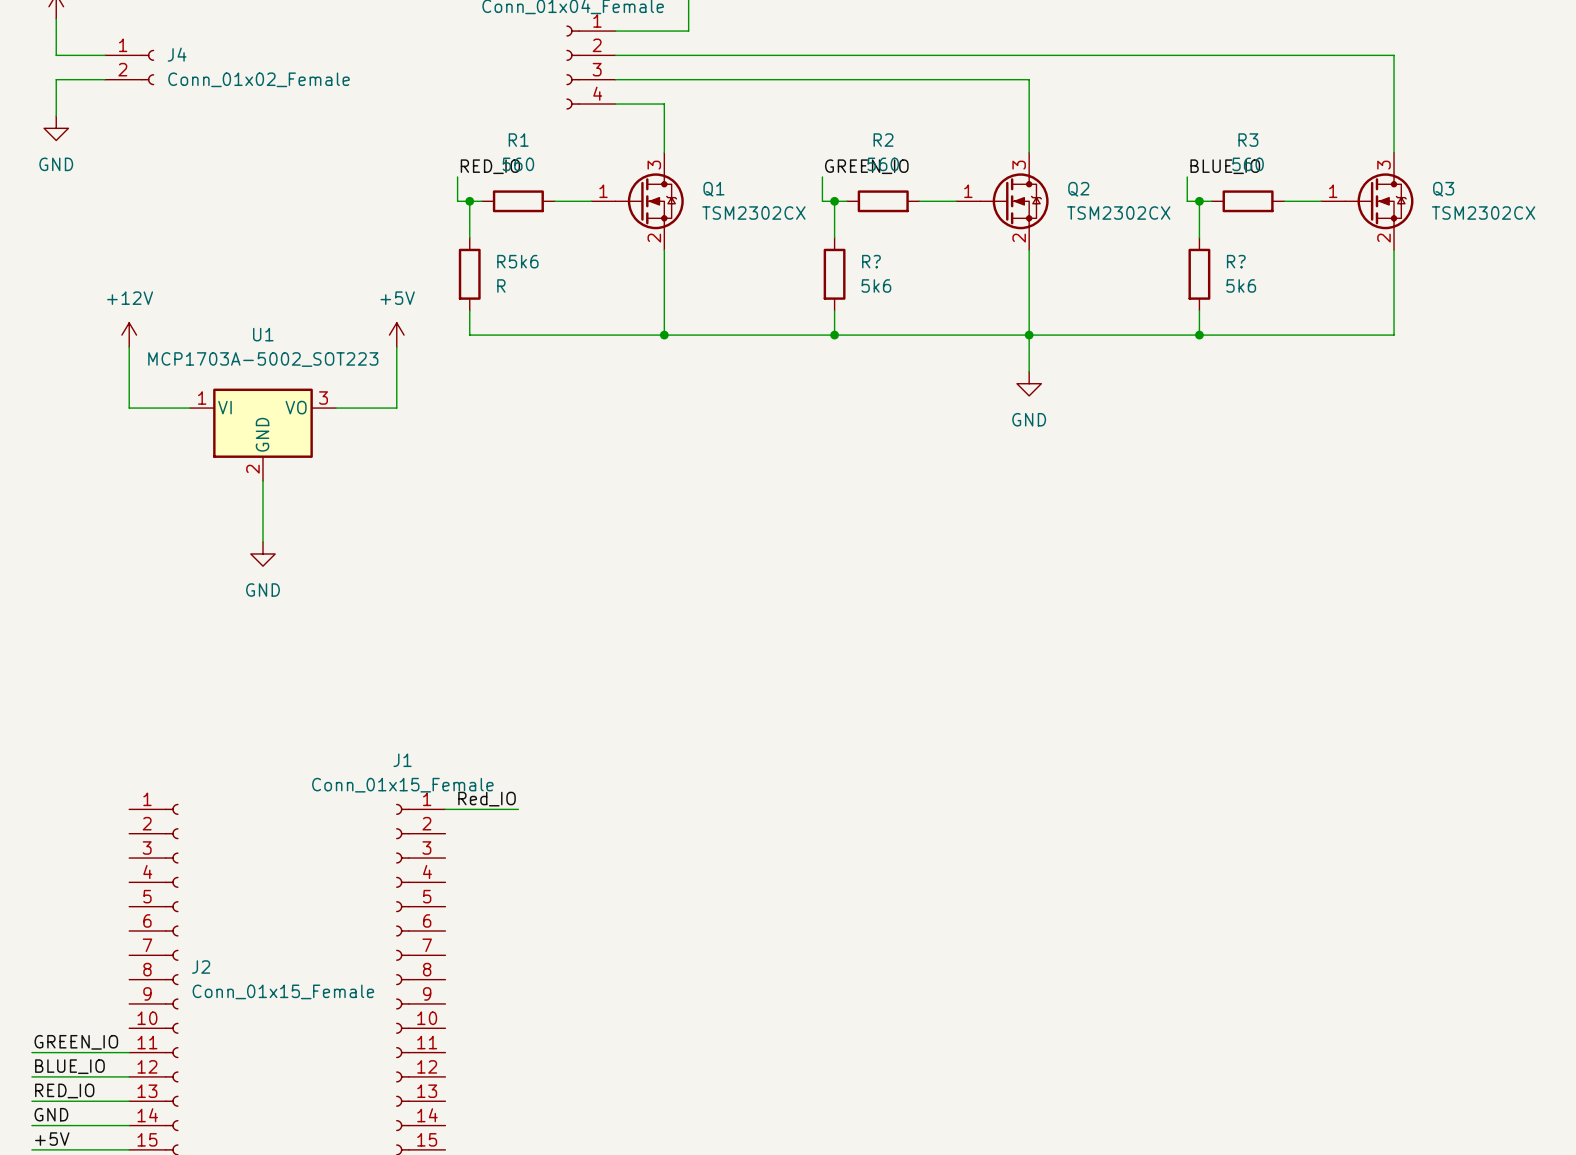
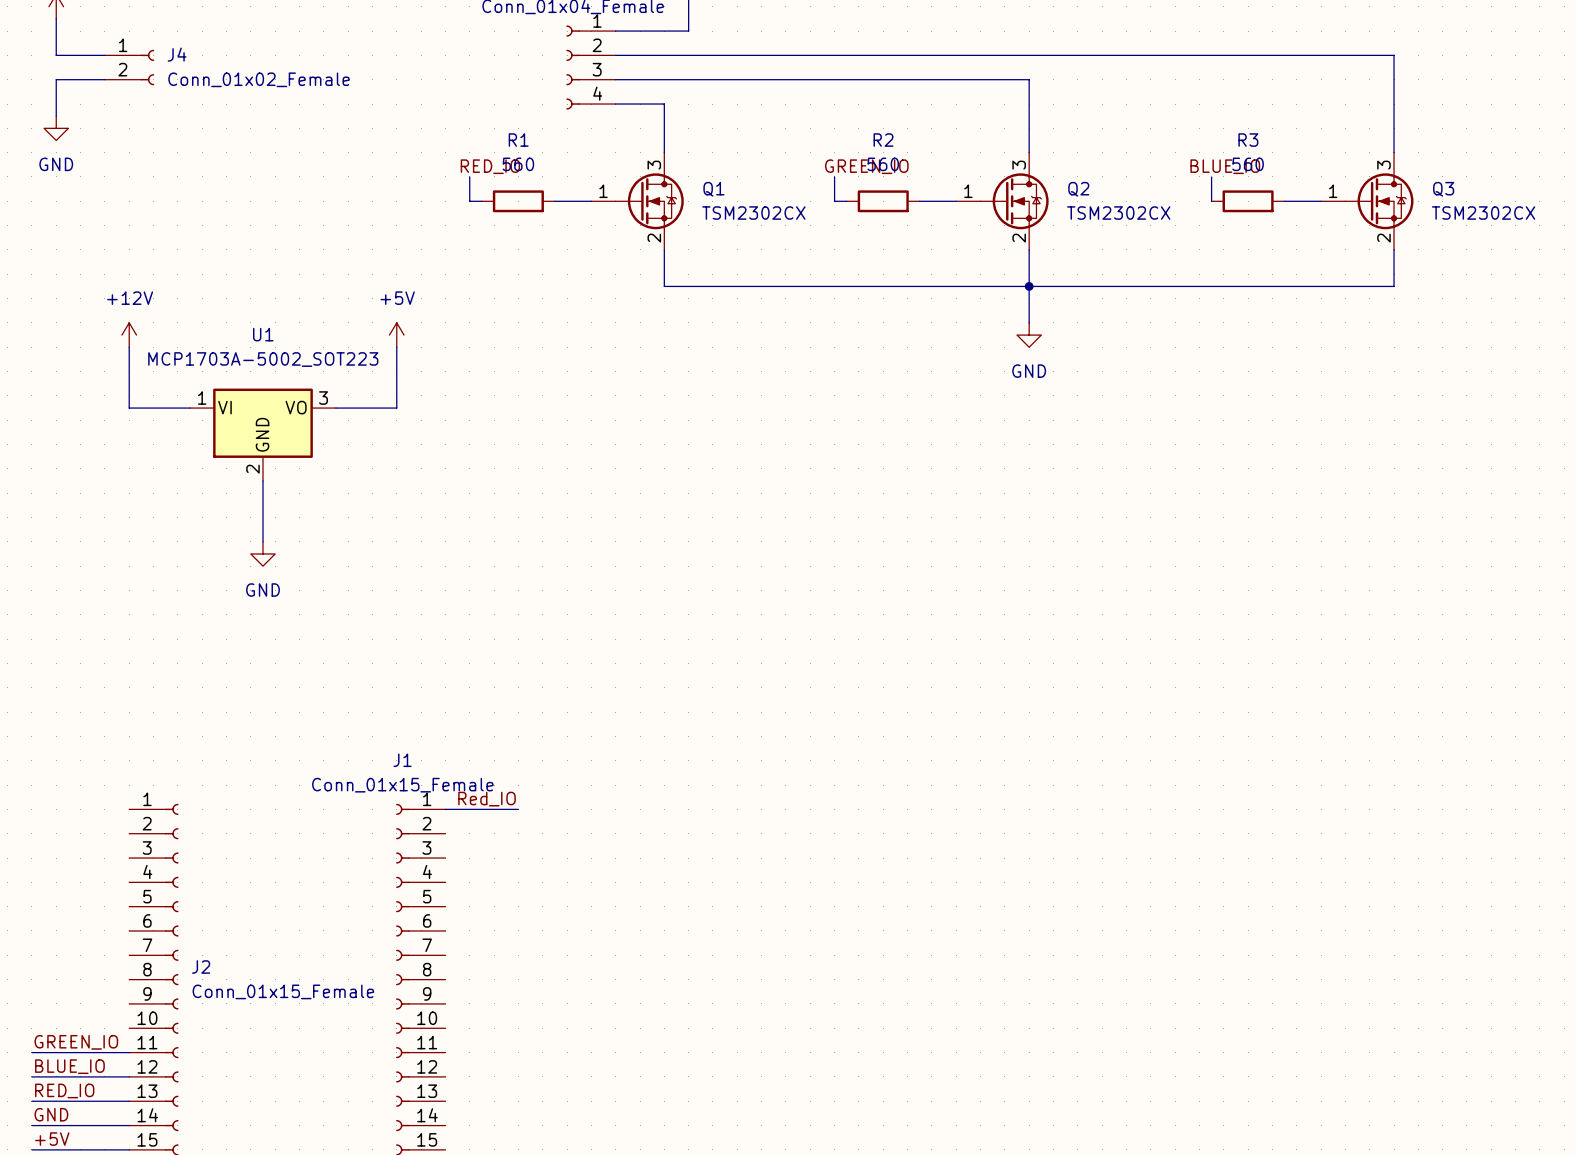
wire: (457, 176) (457, 201) (469, 201) (469, 237) -> none
wire: none -> (469, 176) (469, 201)
wire: (822, 176) (822, 201) (834, 201) (834, 237) -> none
wire: (1187, 176) (1187, 201) (1211, 201) -> (1211, 176) (1211, 201)
junction: (469, 201) -> none
junction: (834, 201) -> none
wire: (1199, 201) (1199, 237) -> none
junction: (1199, 201) -> none
R5k6: R (469, 274) -> none
R?: 5k6 (834, 274) -> none
R?: 5k6 (1199, 274) -> none
wire: (664, 286) (664, 335) -> none
wire: (1394, 286) (1394, 335) (469, 335) (469, 310) -> (1394, 286) (664, 286)
wire: (834, 310) (834, 335) -> (834, 176) (834, 201)
wire: (1199, 310) (1199, 335) -> none
wire: (1029, 322) (1029, 371) -> none
junction: (664, 335) -> none
junction: (834, 335) -> none
junction position: (1029, 335) -> (1029, 286)
junction: (1199, 335) -> none
power symbol position: GND (1029, 383) -> GND (1029, 335)

